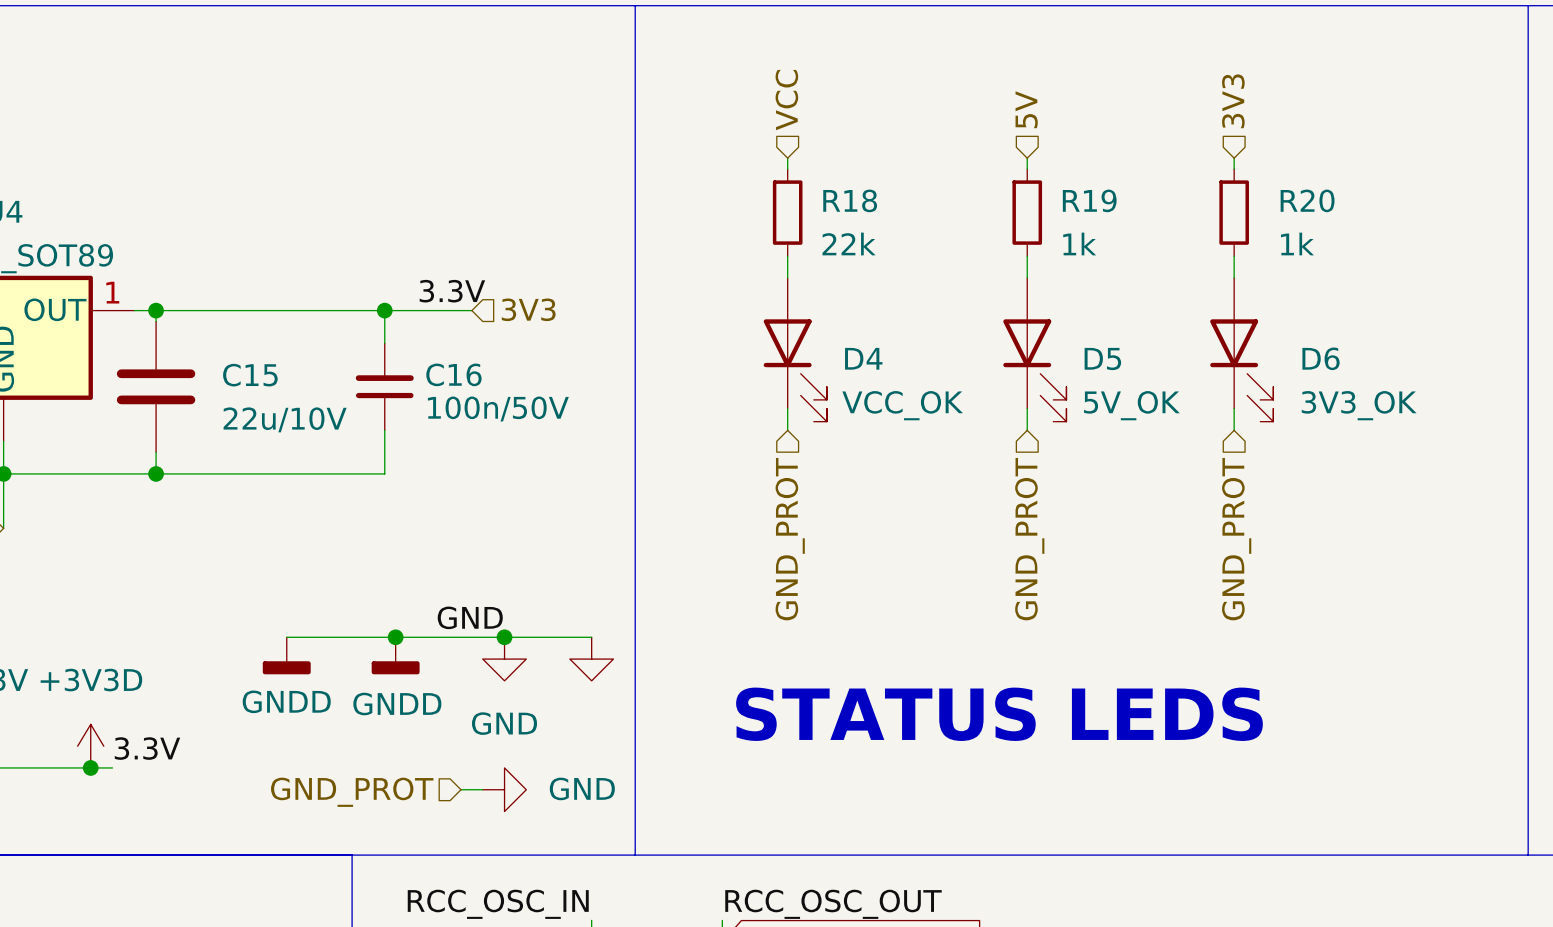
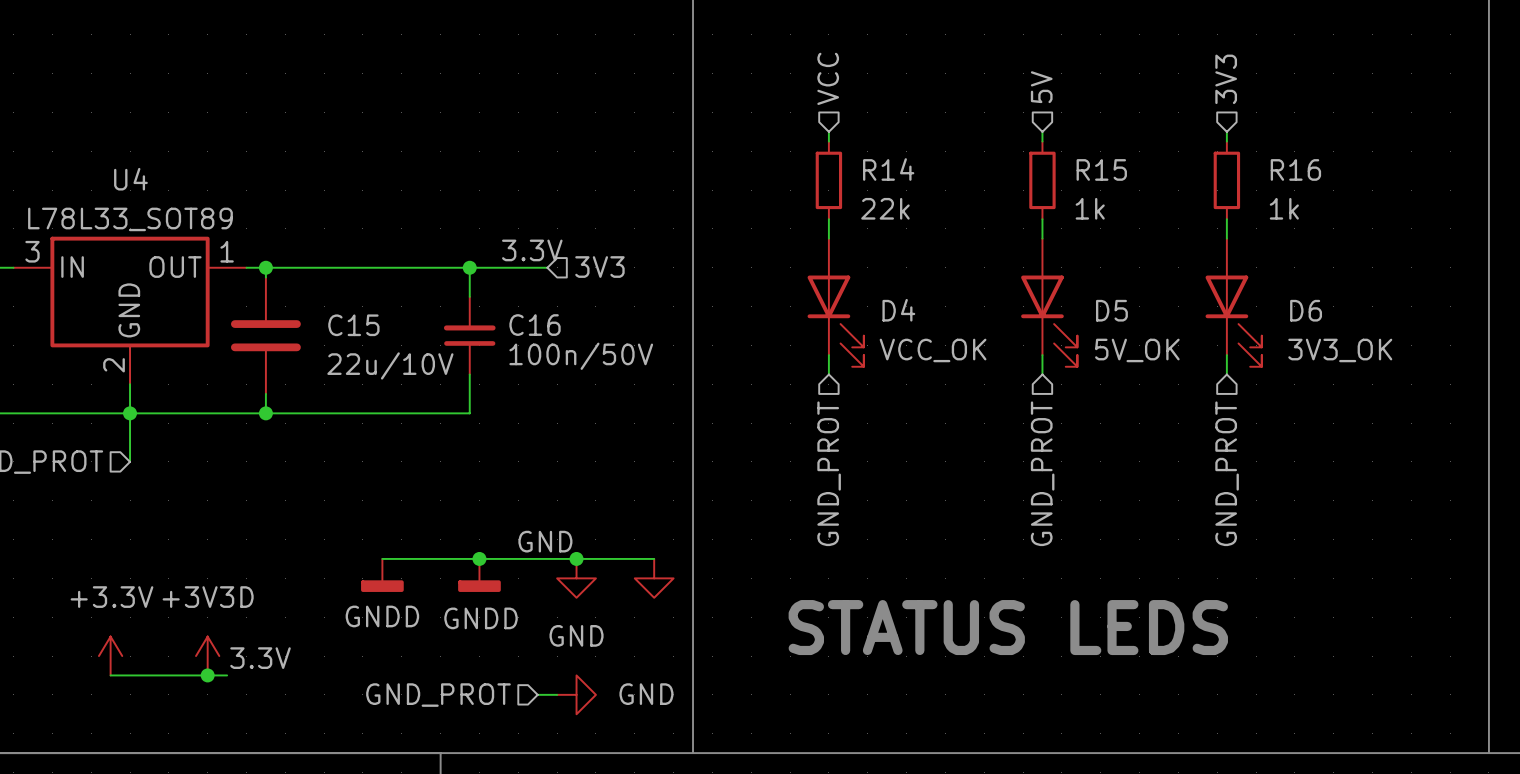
R18 name: R18 (850, 200) -> R14 (888, 169)
R19 name: R19 (1089, 200) -> R15 (1101, 169)
R20 name: R20 (1307, 200) -> R16 (1295, 169)

